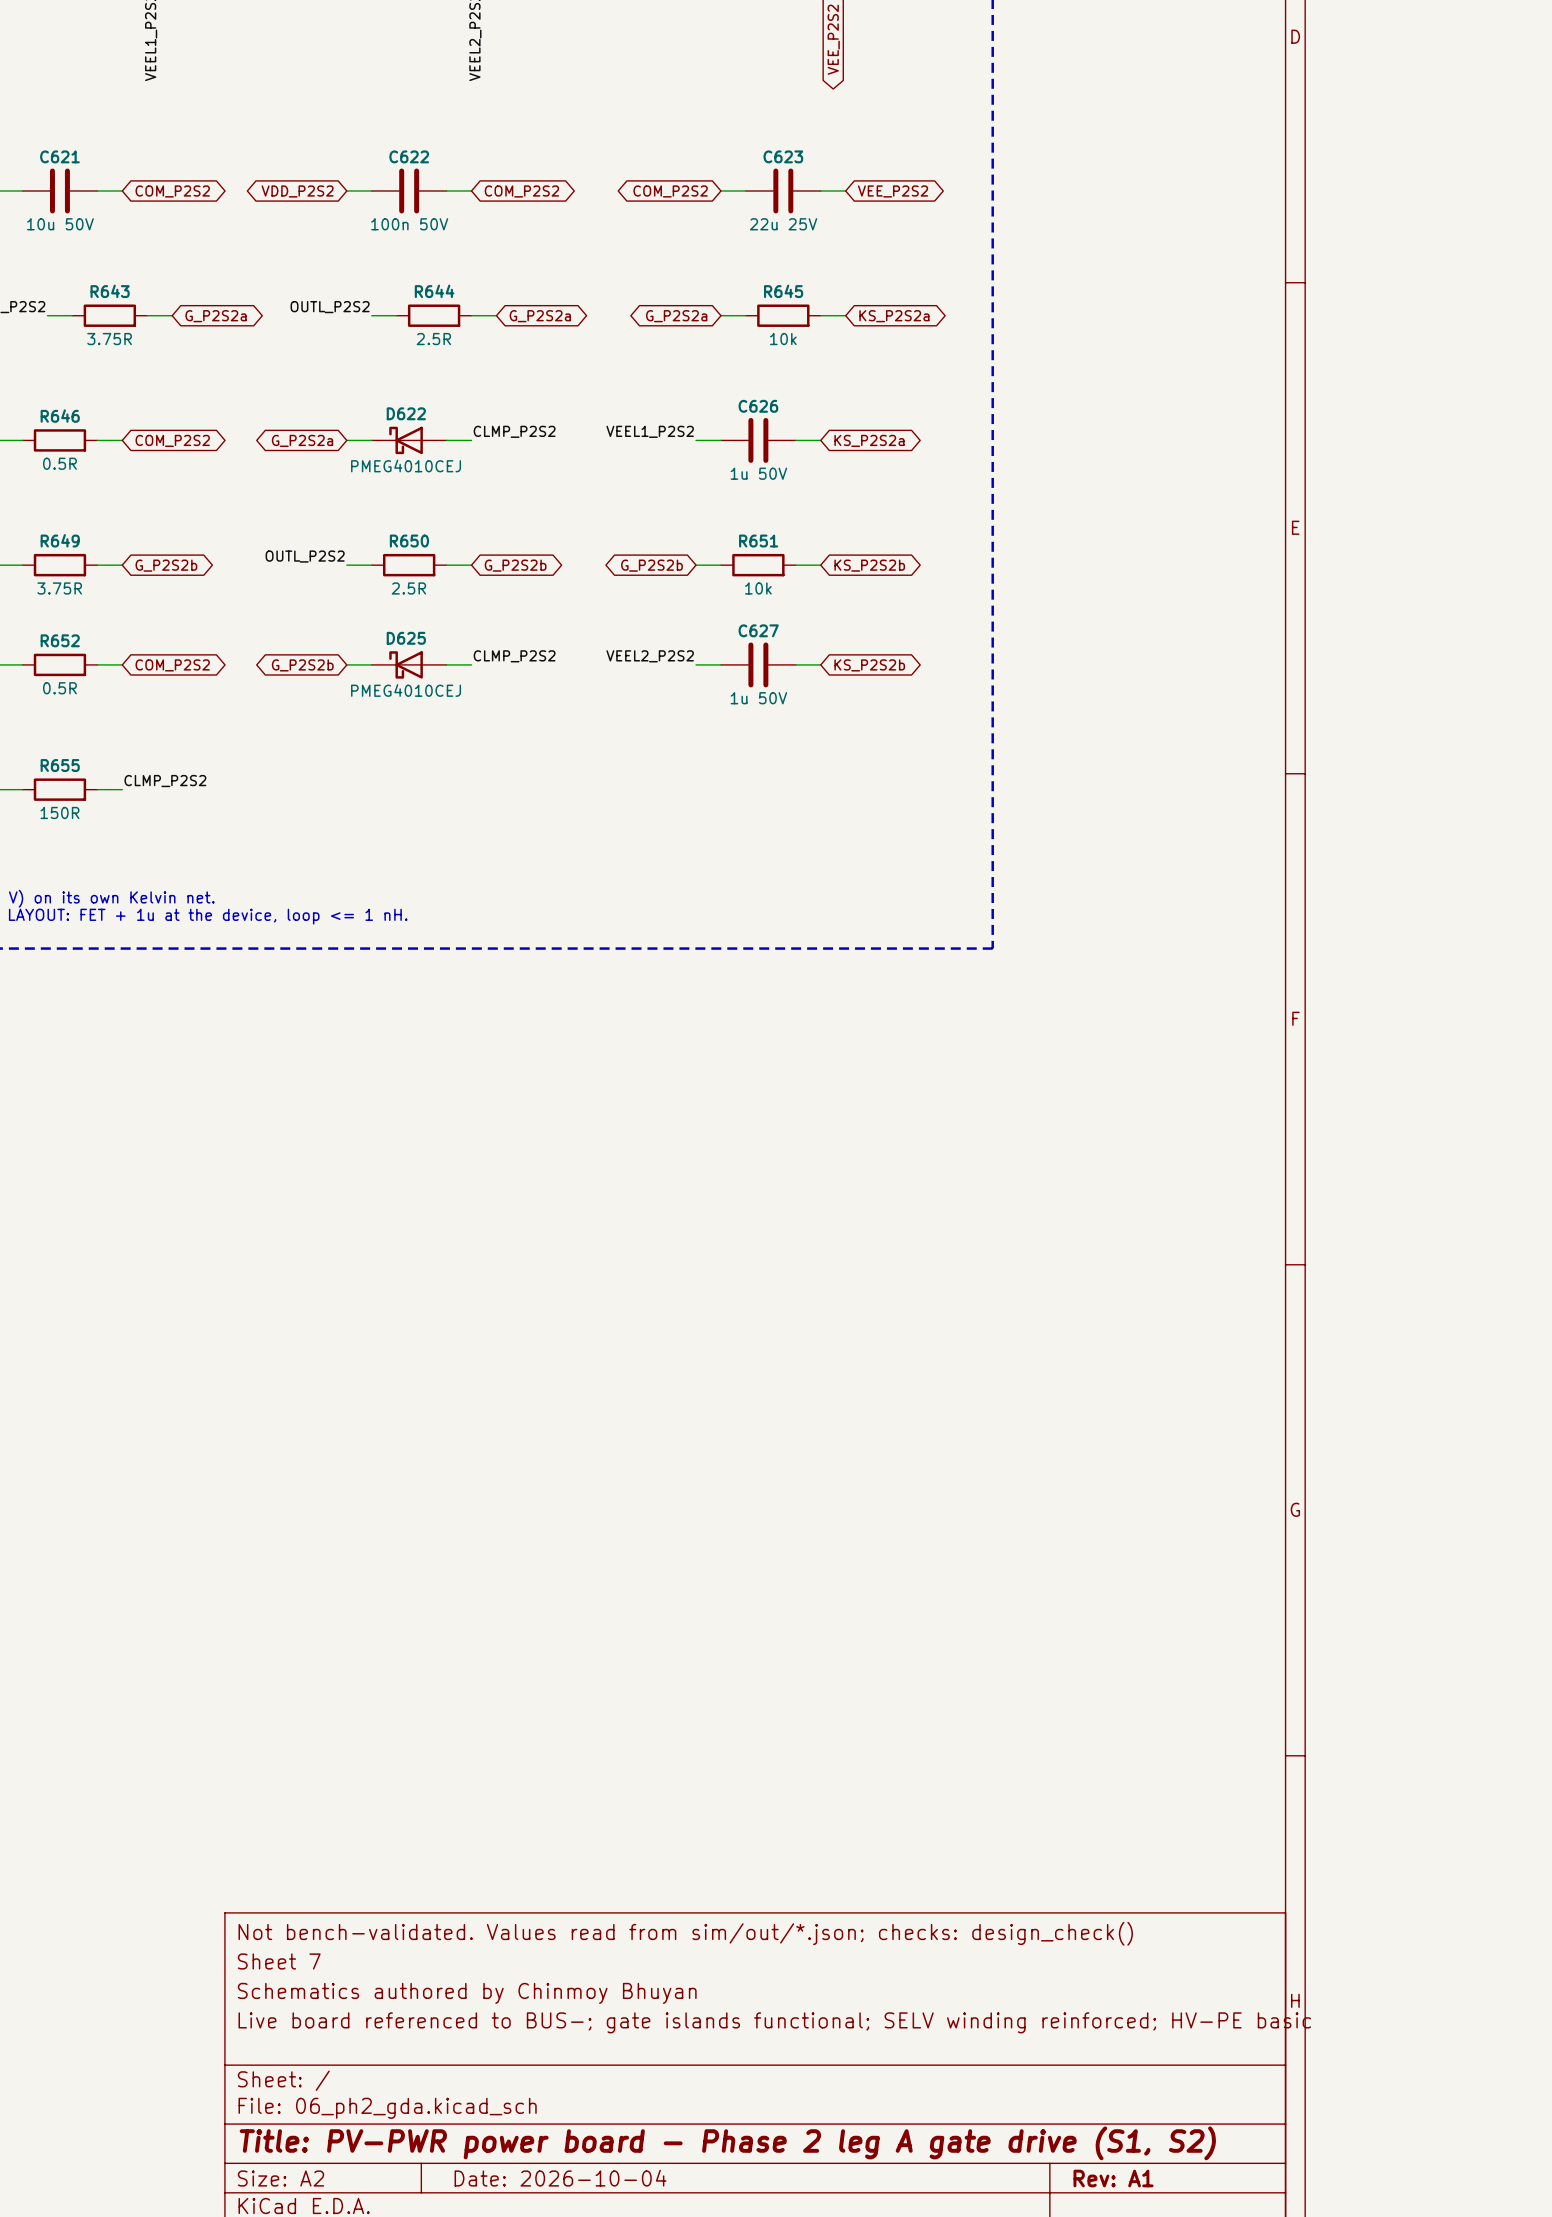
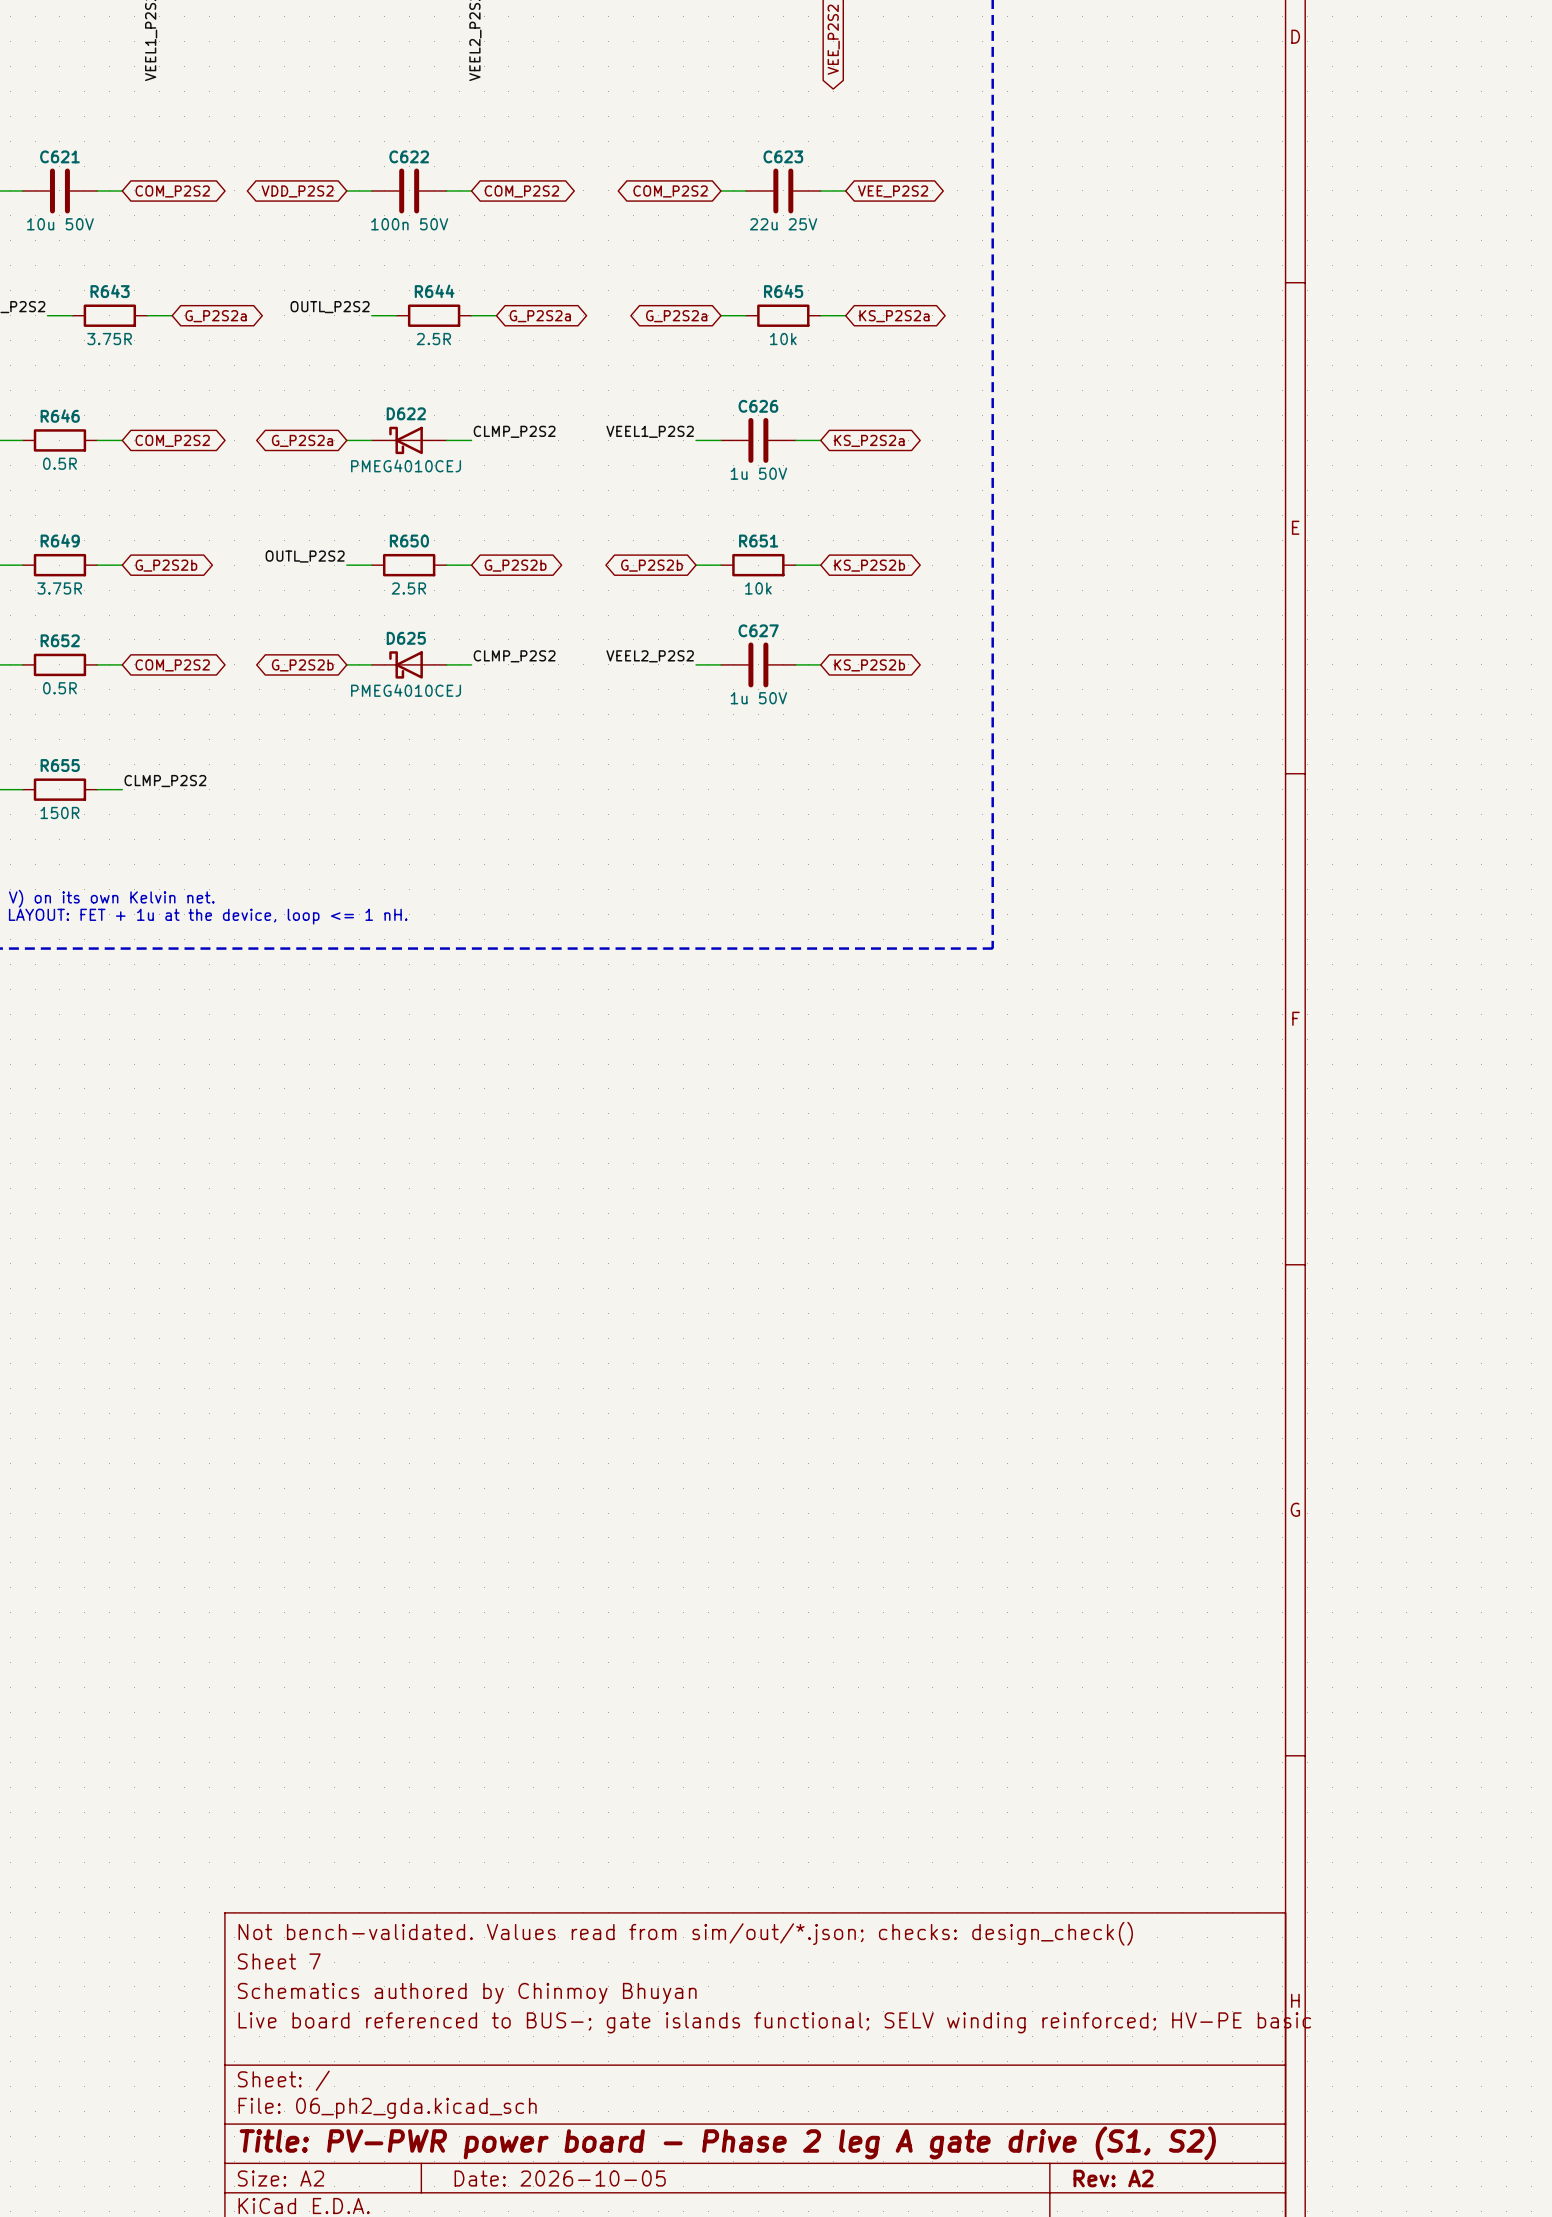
title block: Date: 2026-10-04 (560, 2178) -> Date: 2026-10-05 (560, 2178)
title block: Rev: A1 (1113, 2178) -> Rev: A2 (1113, 2178)

